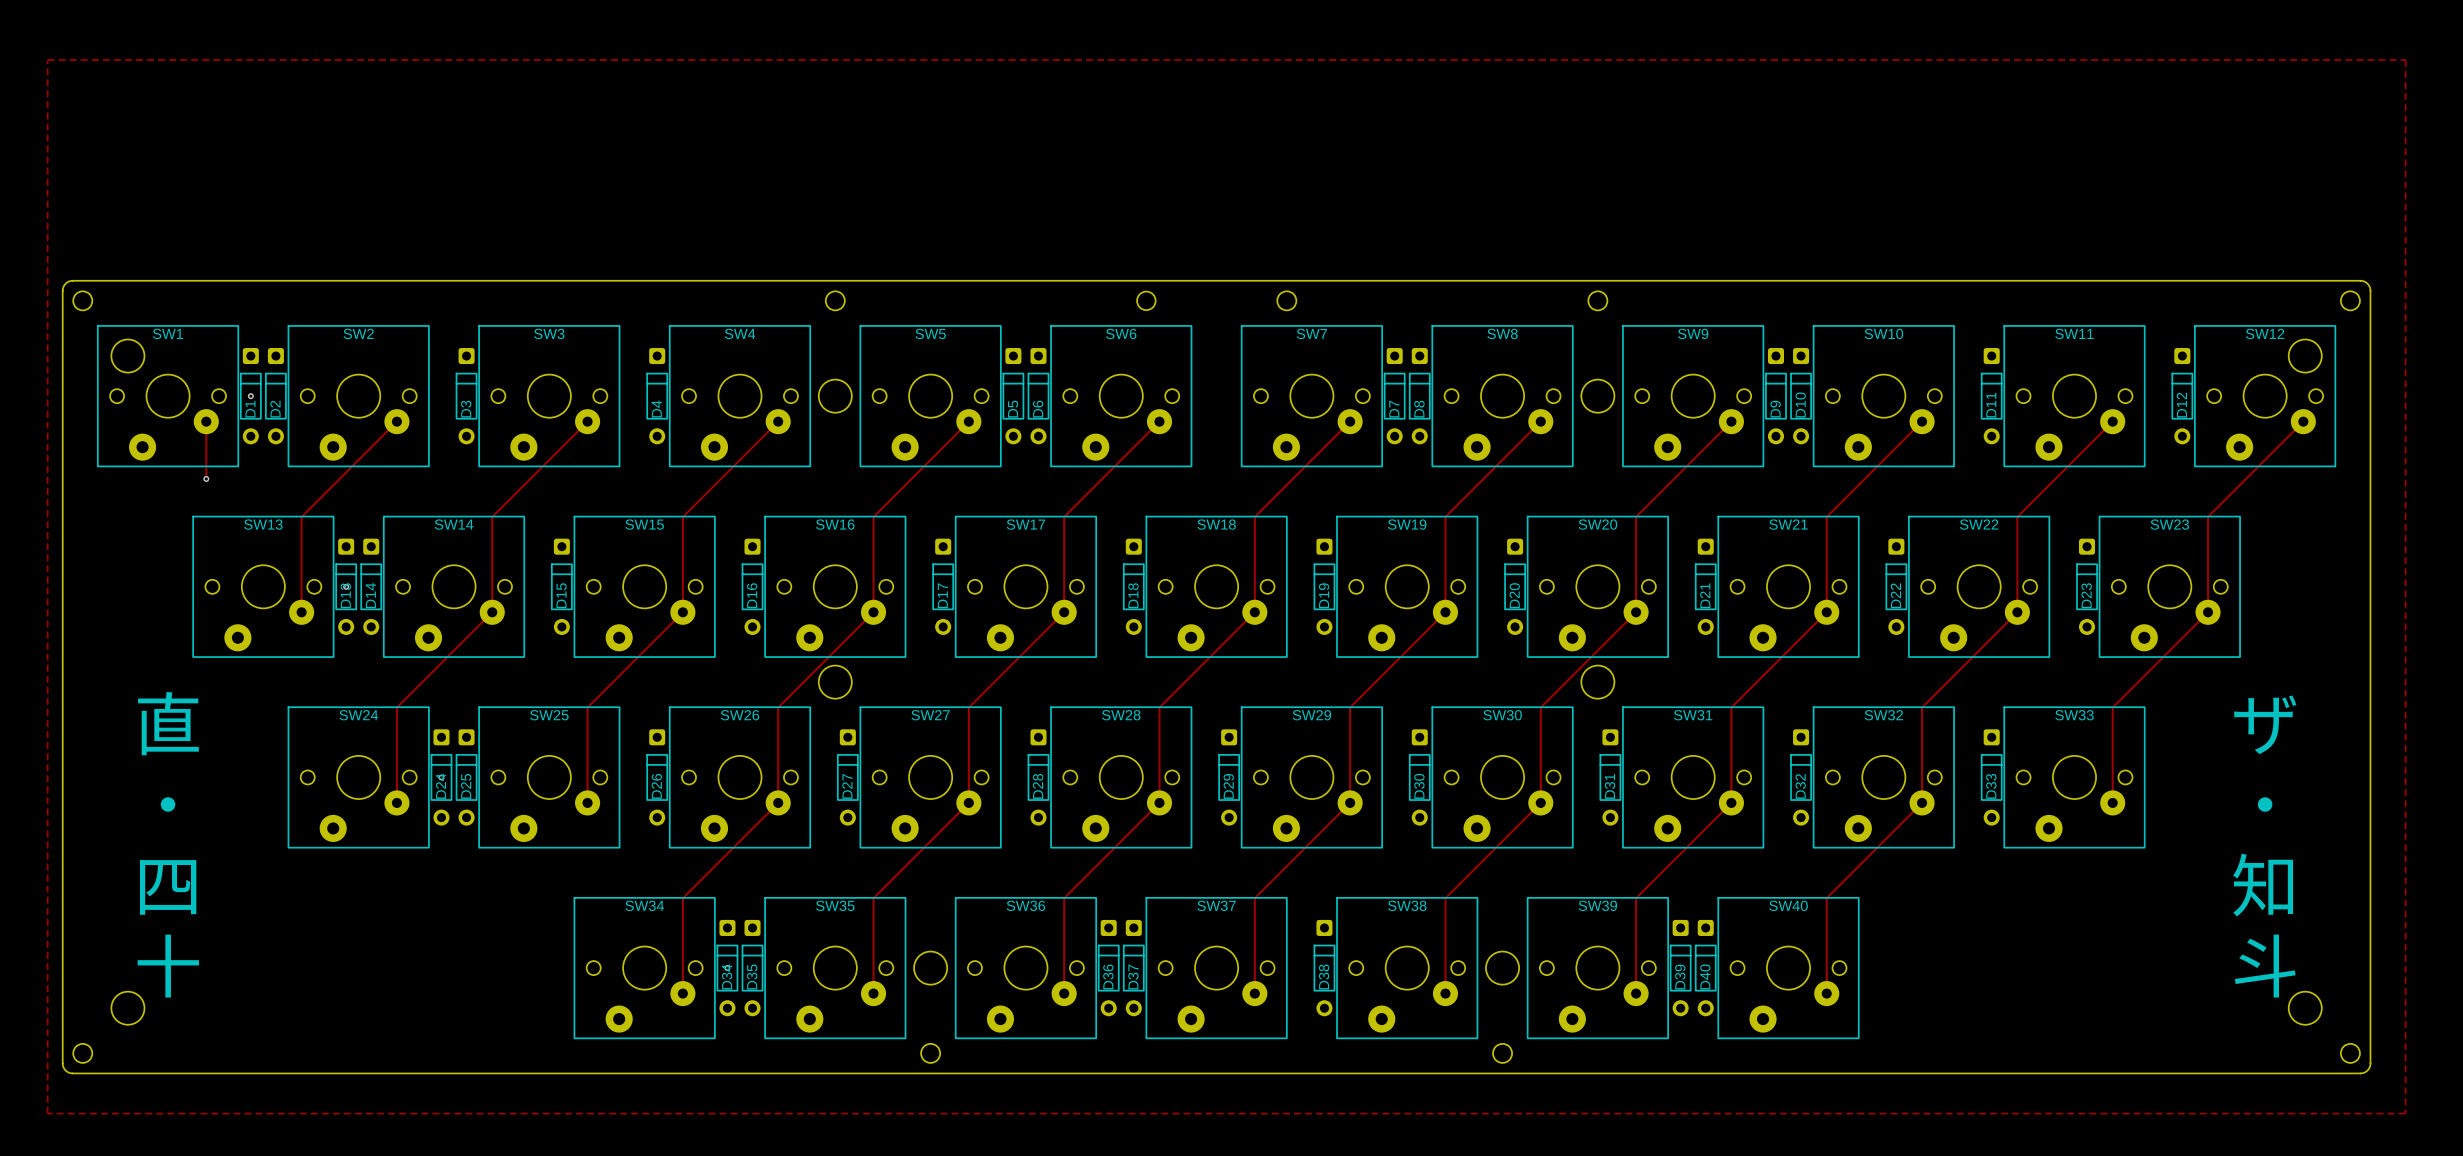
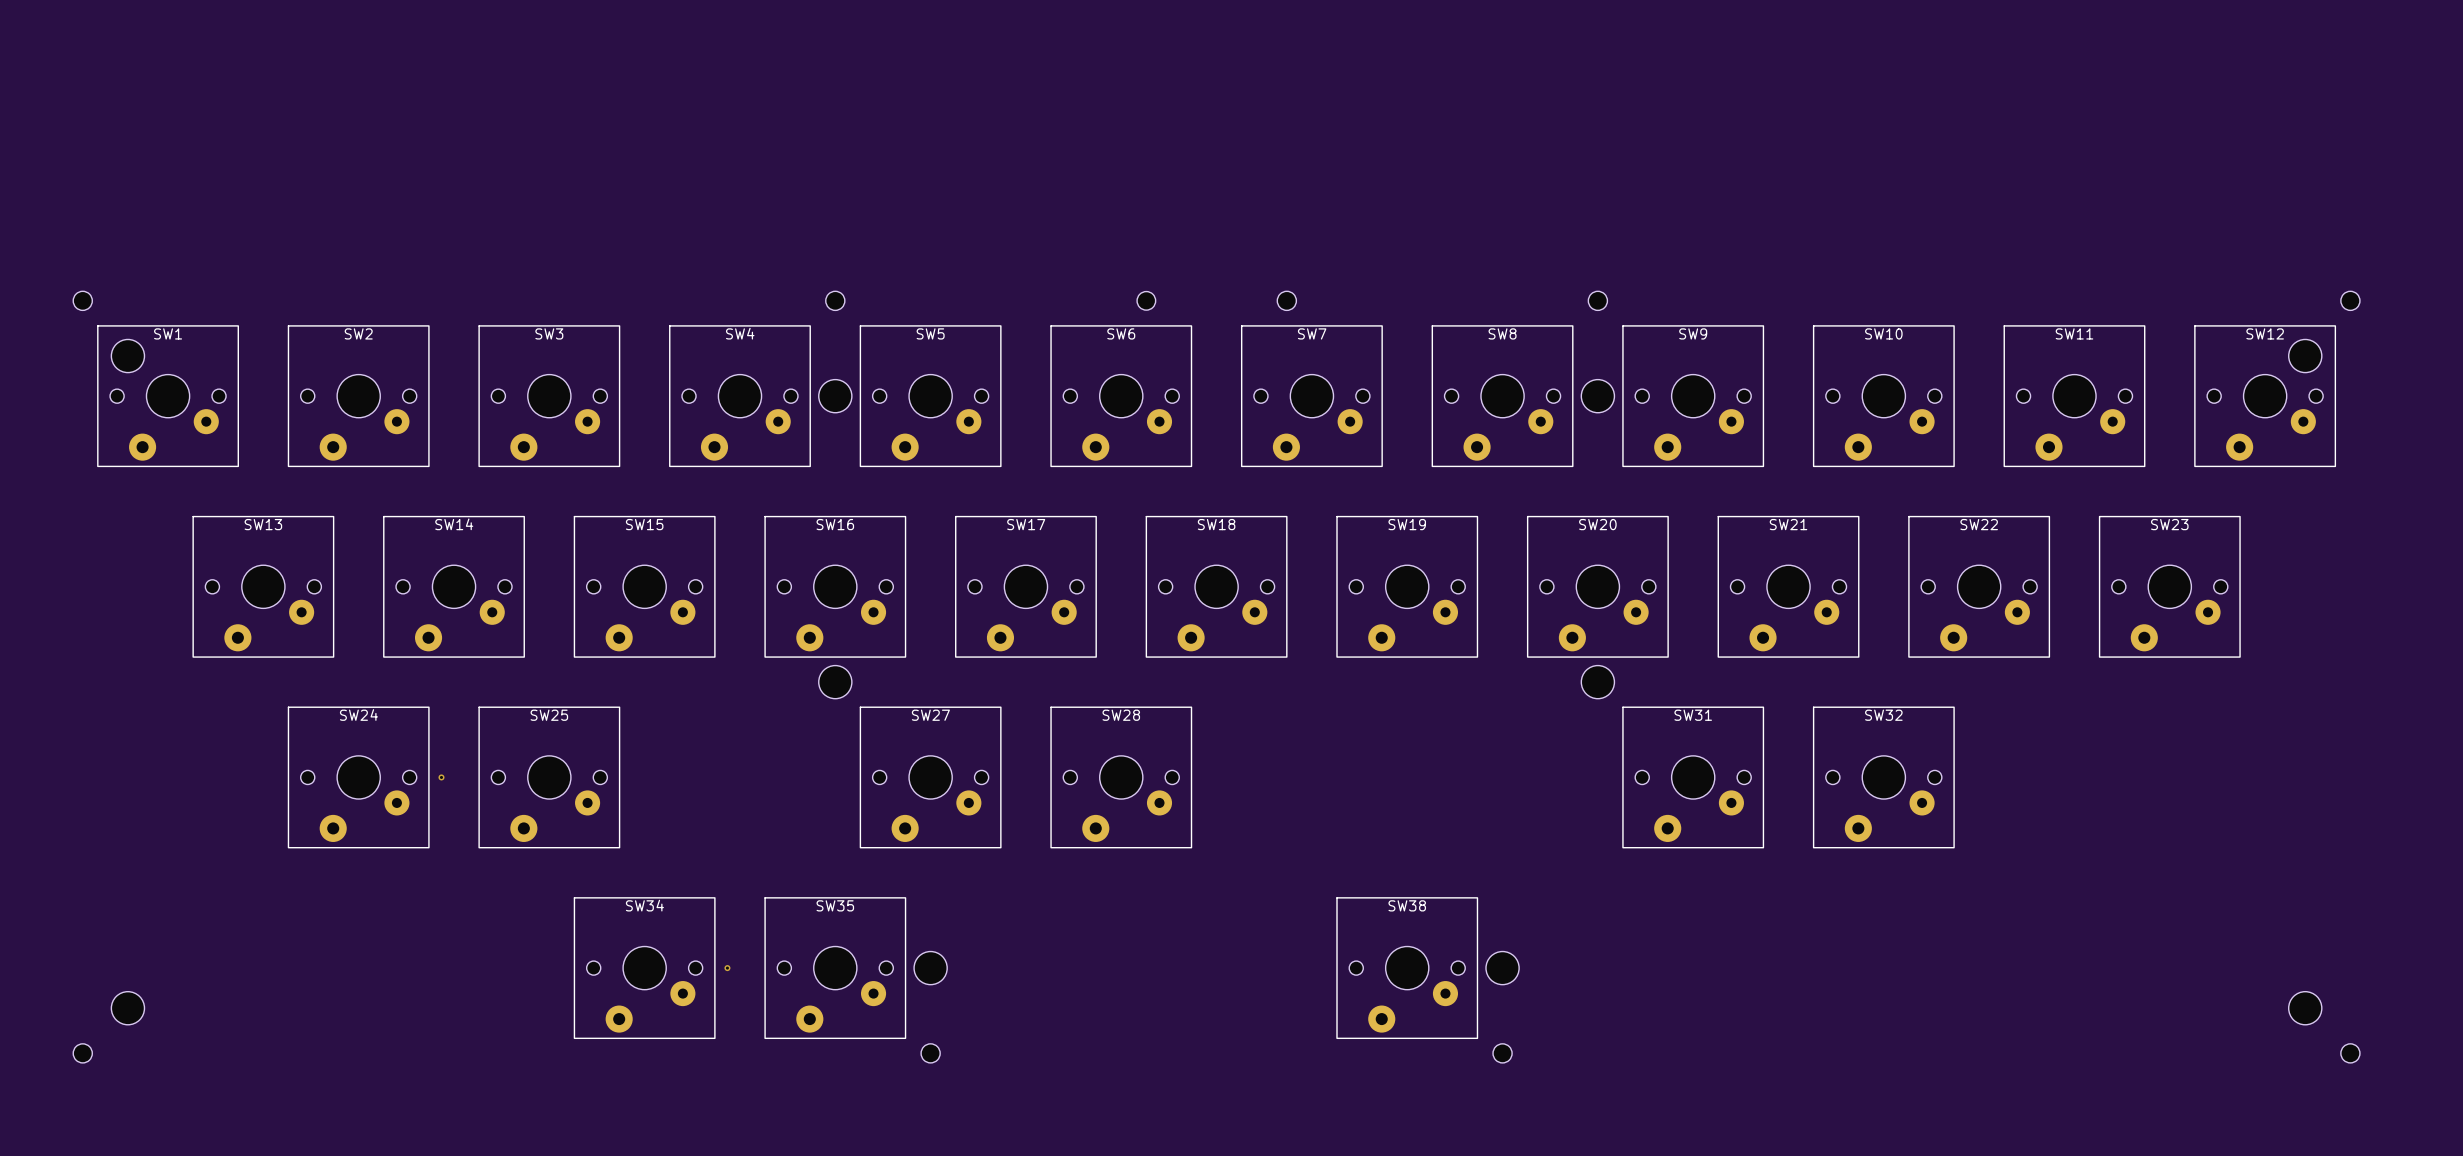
zone outline: (47, 60) (2405, 60) (2405, 1113) (47, 1113) (47, 60) -> none
board edge: (72, 280) (2363, 281) (2368, 284) (2370, 290) (2369, 1066) (2366, 1071) (2360, 1073) (69, 1072) (64, 1068) (62, 1063) (62, 290) (65, 283) (72, 280) -> none
D1: (250, 396) -> none
via: (250, 396) -> none
D2: (275, 396) -> none
D3: (466, 396) -> none
D4: (657, 396) -> none
D5: (1013, 396) -> none
D6: (1038, 396) -> none
D7: (1394, 396) -> none
D8: (1419, 396) -> none
D9: (1775, 396) -> none
D10: (1801, 396) -> none
D11: (1991, 396) -> none
D12: (2182, 396) -> none
track: (206, 421) (206, 478) -> none
track: (396, 421) (301, 516) (301, 612) -> none
track: (587, 421) (492, 516) (492, 612) (396, 707) (396, 802) -> none
track: (778, 421) (682, 516) (682, 612) (587, 707) (587, 802) -> none
track: (968, 421) (873, 516) (873, 612) (778, 707) (778, 802) (682, 898) (682, 993) -> none
track: (1159, 421) (1064, 516) (1064, 612) (968, 707) (968, 802) (873, 898) (873, 993) -> none
track: (1350, 421) (1254, 516) (1254, 612) (1159, 707) (1159, 802) (1064, 898) (1064, 993) -> none
track: (1540, 421) (1445, 516) (1445, 612) (1350, 707) (1350, 802) (1254, 898) (1254, 993) -> none
track: (1731, 421) (1636, 516) (1636, 612) (1540, 707) (1540, 802) (1445, 898) (1445, 993) -> none
track: (1922, 421) (1826, 516) (1826, 612) (1731, 707) (1731, 802) (1636, 898) (1636, 993) -> none
track: (2112, 421) (2017, 516) (2017, 612) (1922, 707) (1922, 802) (1826, 898) (1826, 993) -> none
track: (2303, 421) (2208, 516) (2208, 612) (2112, 707) (2112, 802) -> none
via: (206, 478) -> none
D13: (346, 586) -> none
via: (346, 586) -> none
D14: (371, 586) -> none
D15: (561, 586) -> none
D16: (752, 586) -> none
D17: (943, 586) -> none
D18: (1133, 586) -> none
D19: (1324, 586) -> none
D20: (1515, 586) -> none
D21: (1705, 586) -> none
D22: (1896, 586) -> none
D23: (2087, 586) -> none
text: 直 (168, 723) -> none
text: ザ (2265, 724) -> none
D24: (441, 777) -> none
D25: (466, 777) -> none
D26: (657, 777) -> none
SW26: (739, 777) -> none
D27: (847, 777) -> none
D28: (1038, 777) -> none
D29: (1229, 777) -> none
SW29: (1311, 777) -> none
D30: (1419, 777) -> none
SW30: (1502, 777) -> none
D31: (1610, 777) -> none
D32: (1801, 777) -> none
D33: (1991, 777) -> none
SW33: (2074, 777) -> none
text: ・ (168, 804) -> none
text: ・ (2265, 804) -> none
text: 知 (2263, 885) -> none
text: 四 (168, 887) -> none
text: 十 (168, 966) -> none
text: 斗 (2265, 966) -> none
D34: (727, 968) -> none
D35: (752, 968) -> none
SW36: (1025, 968) -> none
D36: (1108, 968) -> none
D37: (1133, 968) -> none
SW37: (1216, 968) -> none
D38: (1324, 968) -> none
SW39: (1597, 968) -> none
D39: (1680, 968) -> none
D40: (1705, 968) -> none
SW40: (1788, 968) -> none

